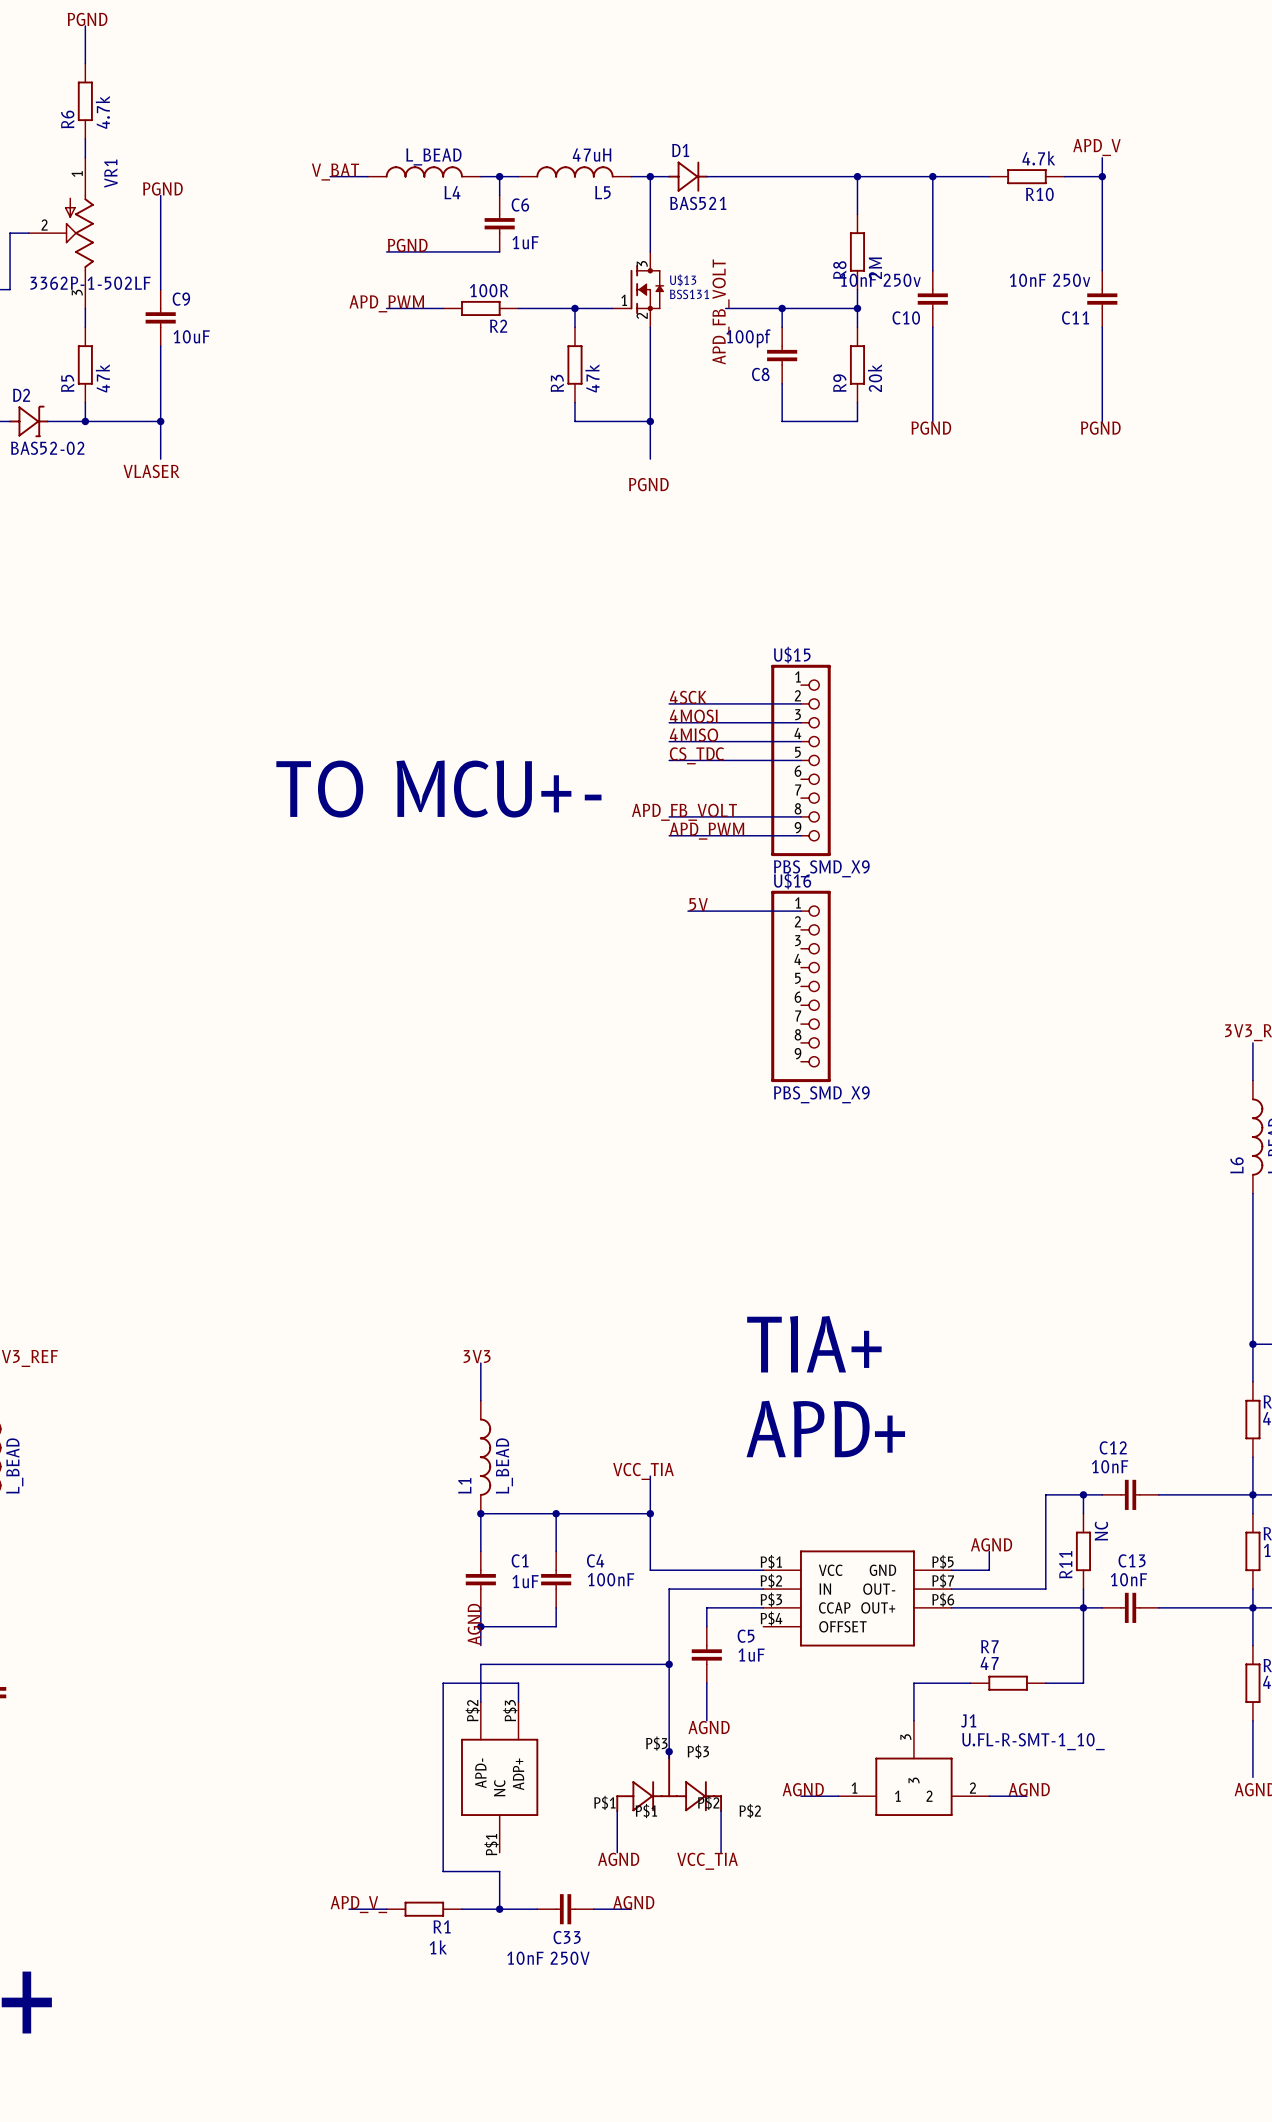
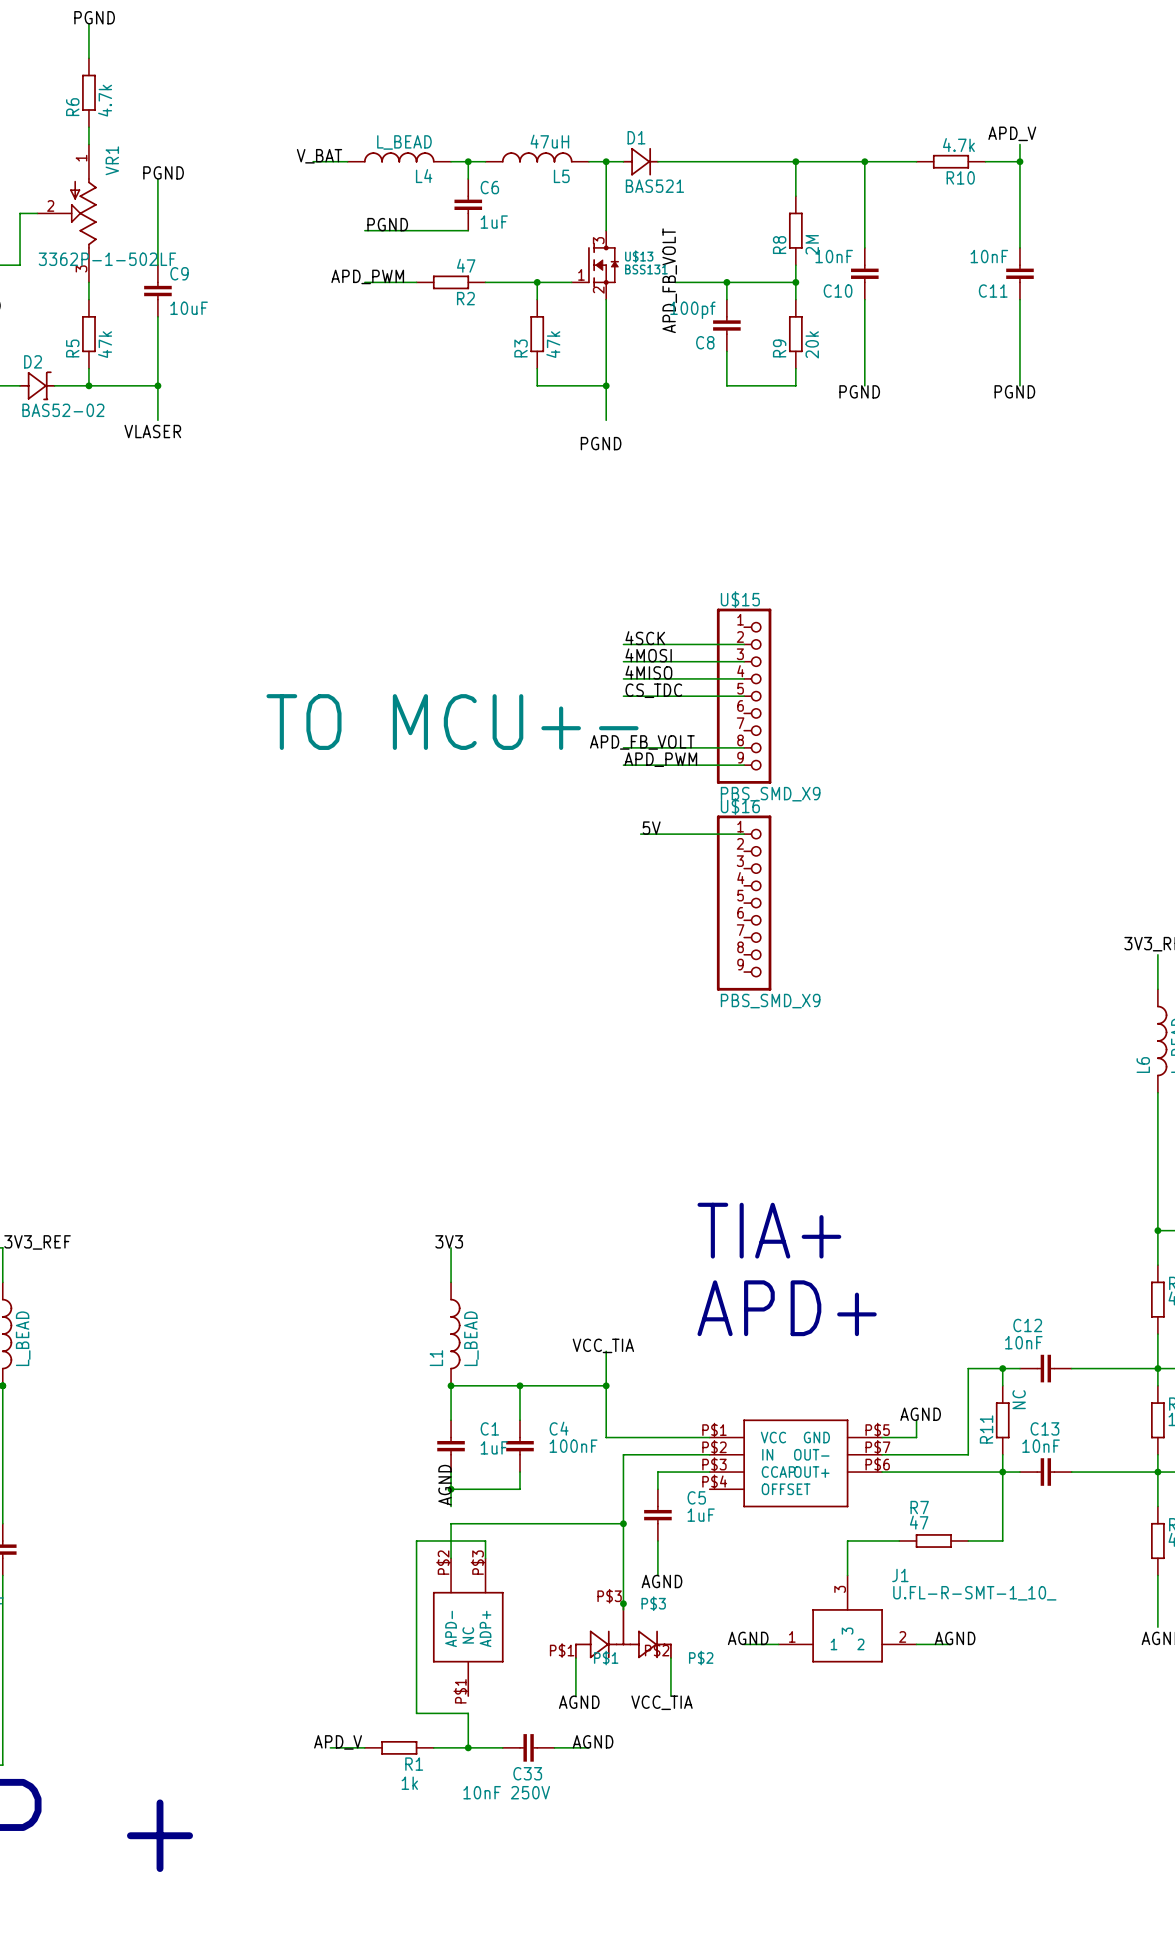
C10 value: 10nF 250v (880, 280) -> 10nF (834, 256)
C11 value: 10nF 250v (1050, 280) -> 10nF (989, 256)
R2 value: 100R (489, 290) -> 47 (466, 265)
label: APD_V_ (358, 1904) -> APD_V (338, 1742)

